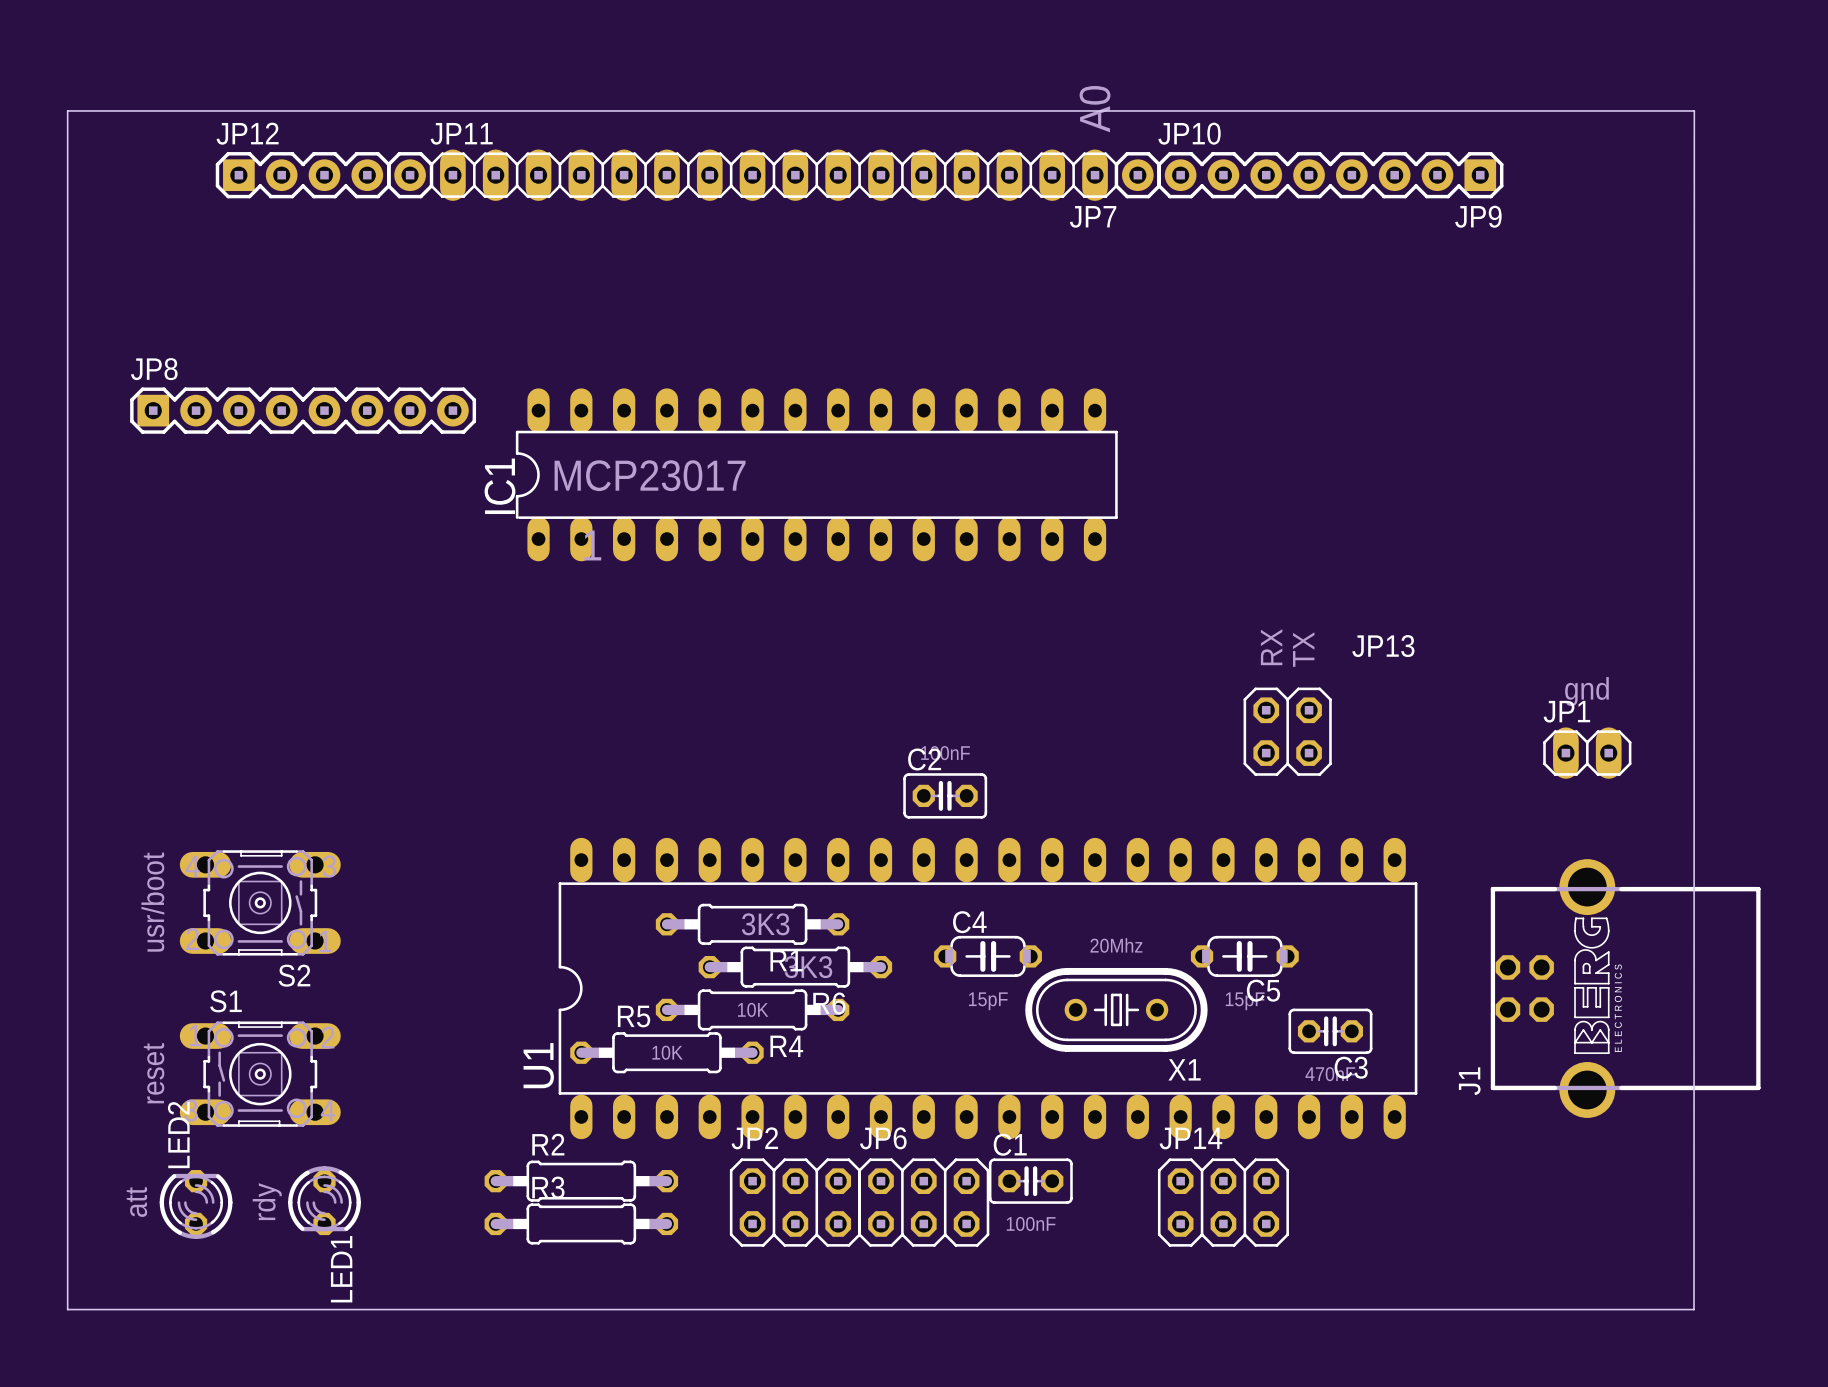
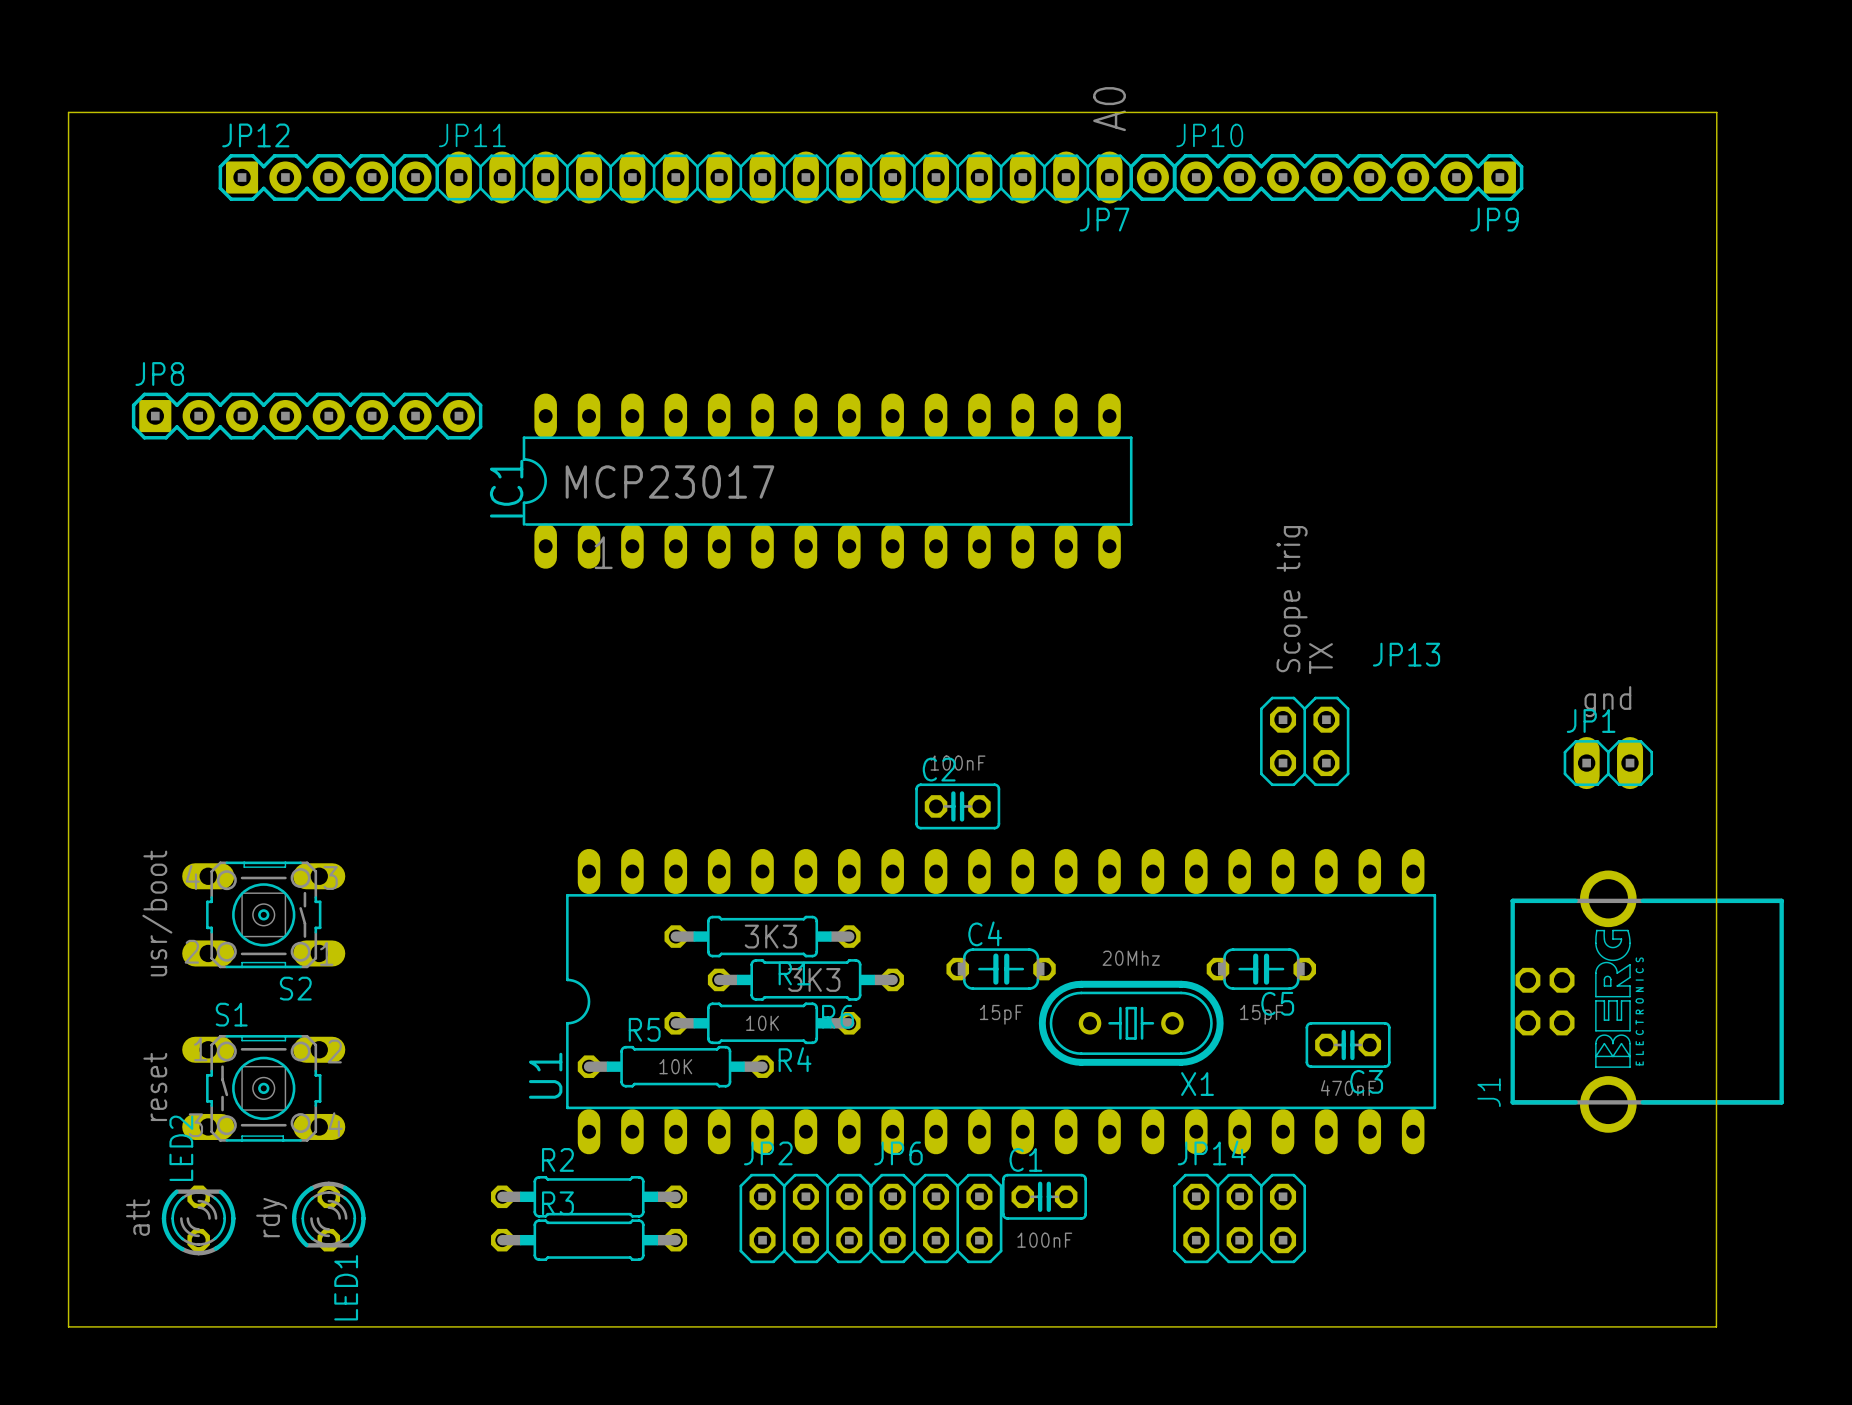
text: RX (1271, 647) -> Scope trig (1292, 599)

